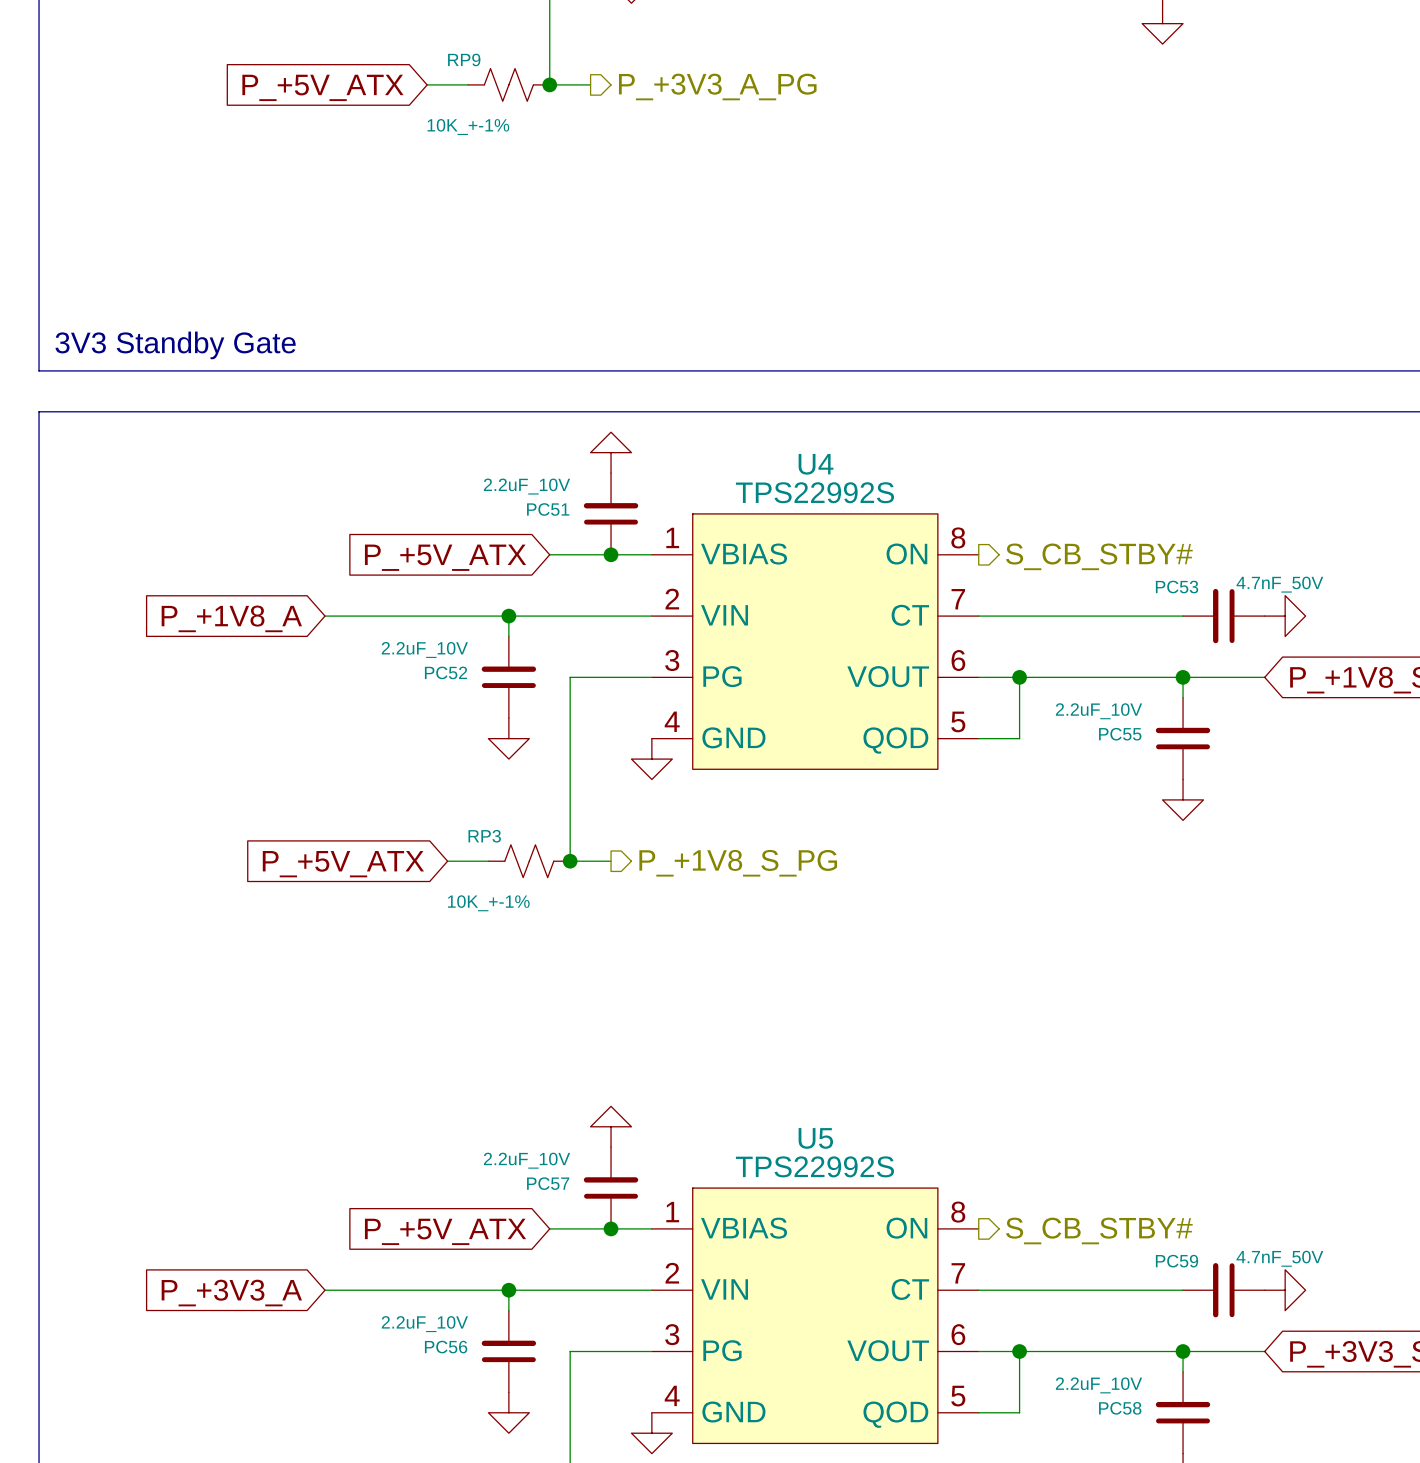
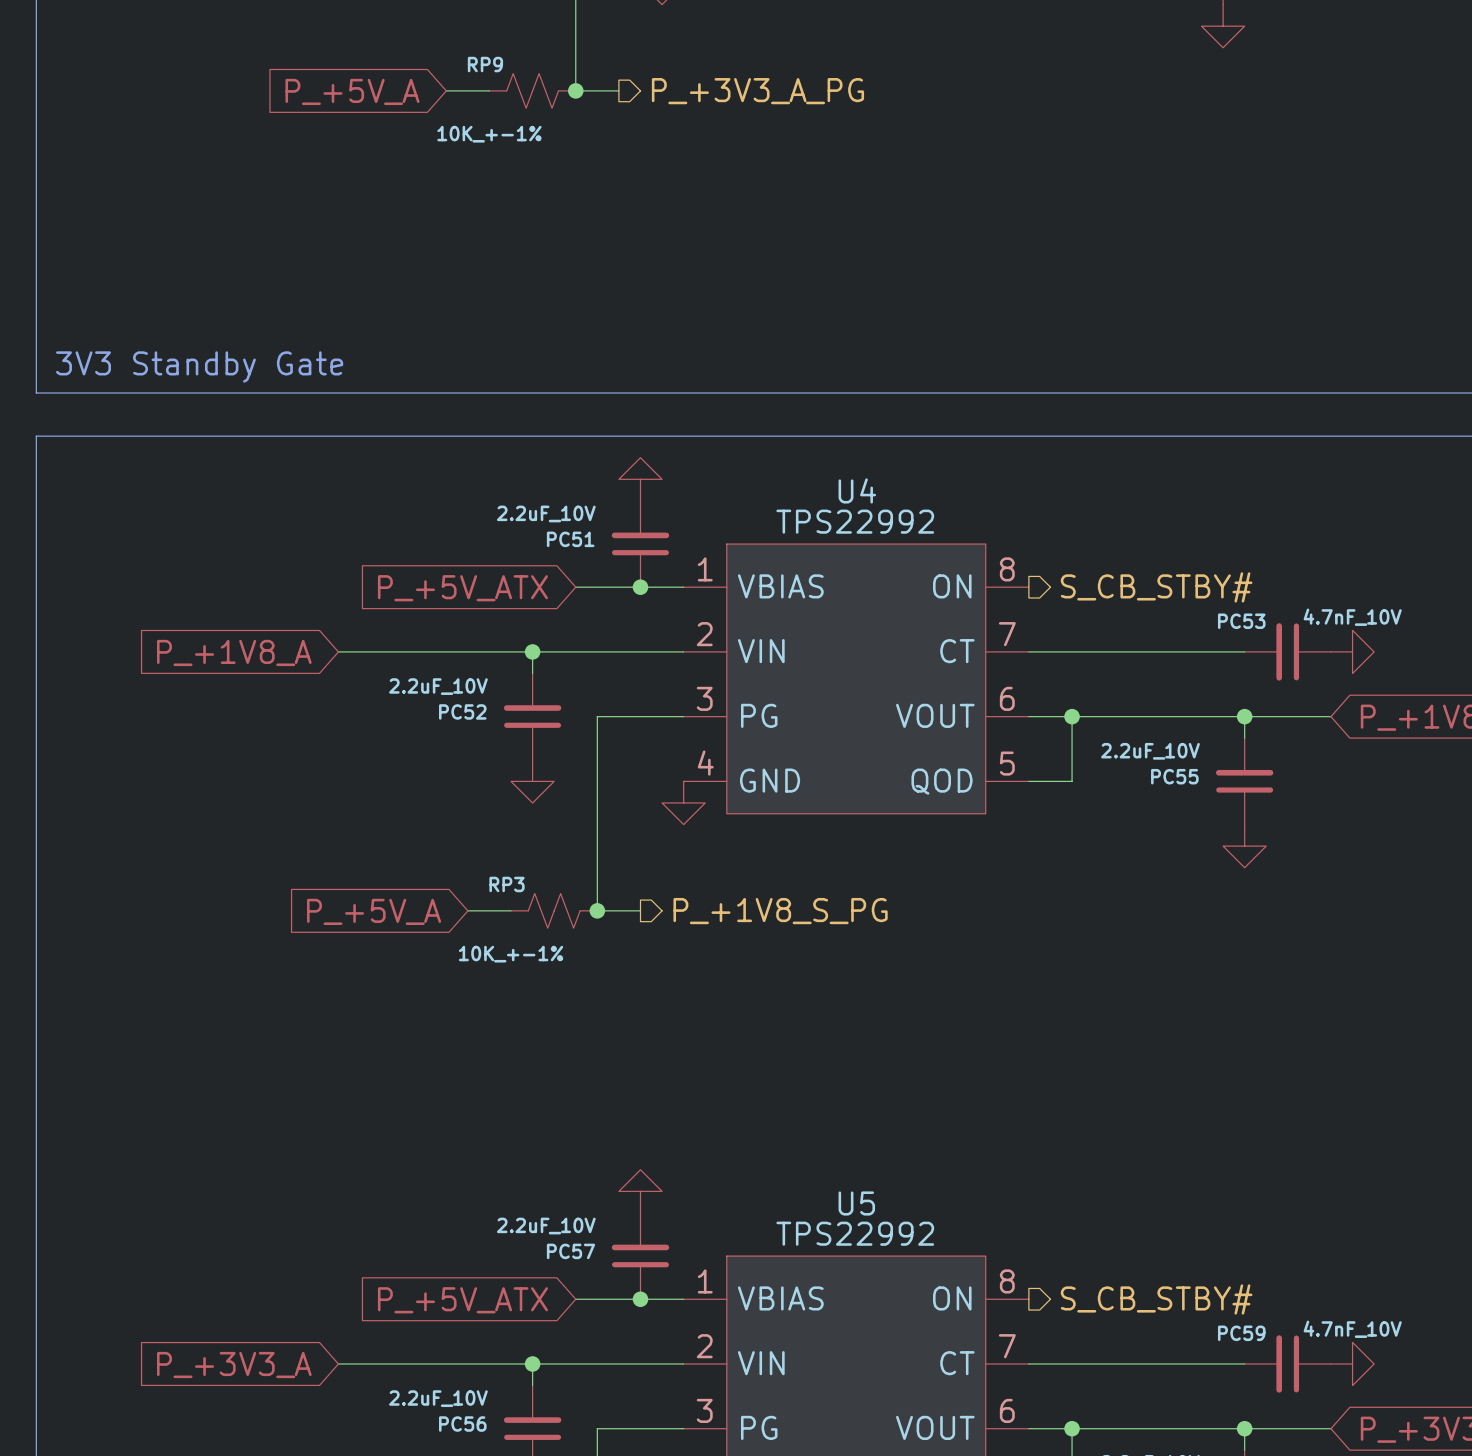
global label: P_+5V_ATX (322, 87) -> P_+5V_A (352, 91)
U4 value: TPS22992S (814, 492) -> TPS22992 (855, 521)
PC53 value: 4.7nF_50V (1279, 584) -> 4.7nF_10V (1352, 617)
global label: P_+5V_ATX (343, 864) -> P_+5V_A (374, 911)
U5 value: TPS22992S (814, 1166) -> TPS22992 (855, 1233)
PC59 value: 4.7nF_50V (1279, 1258) -> 4.7nF_10V (1352, 1329)

